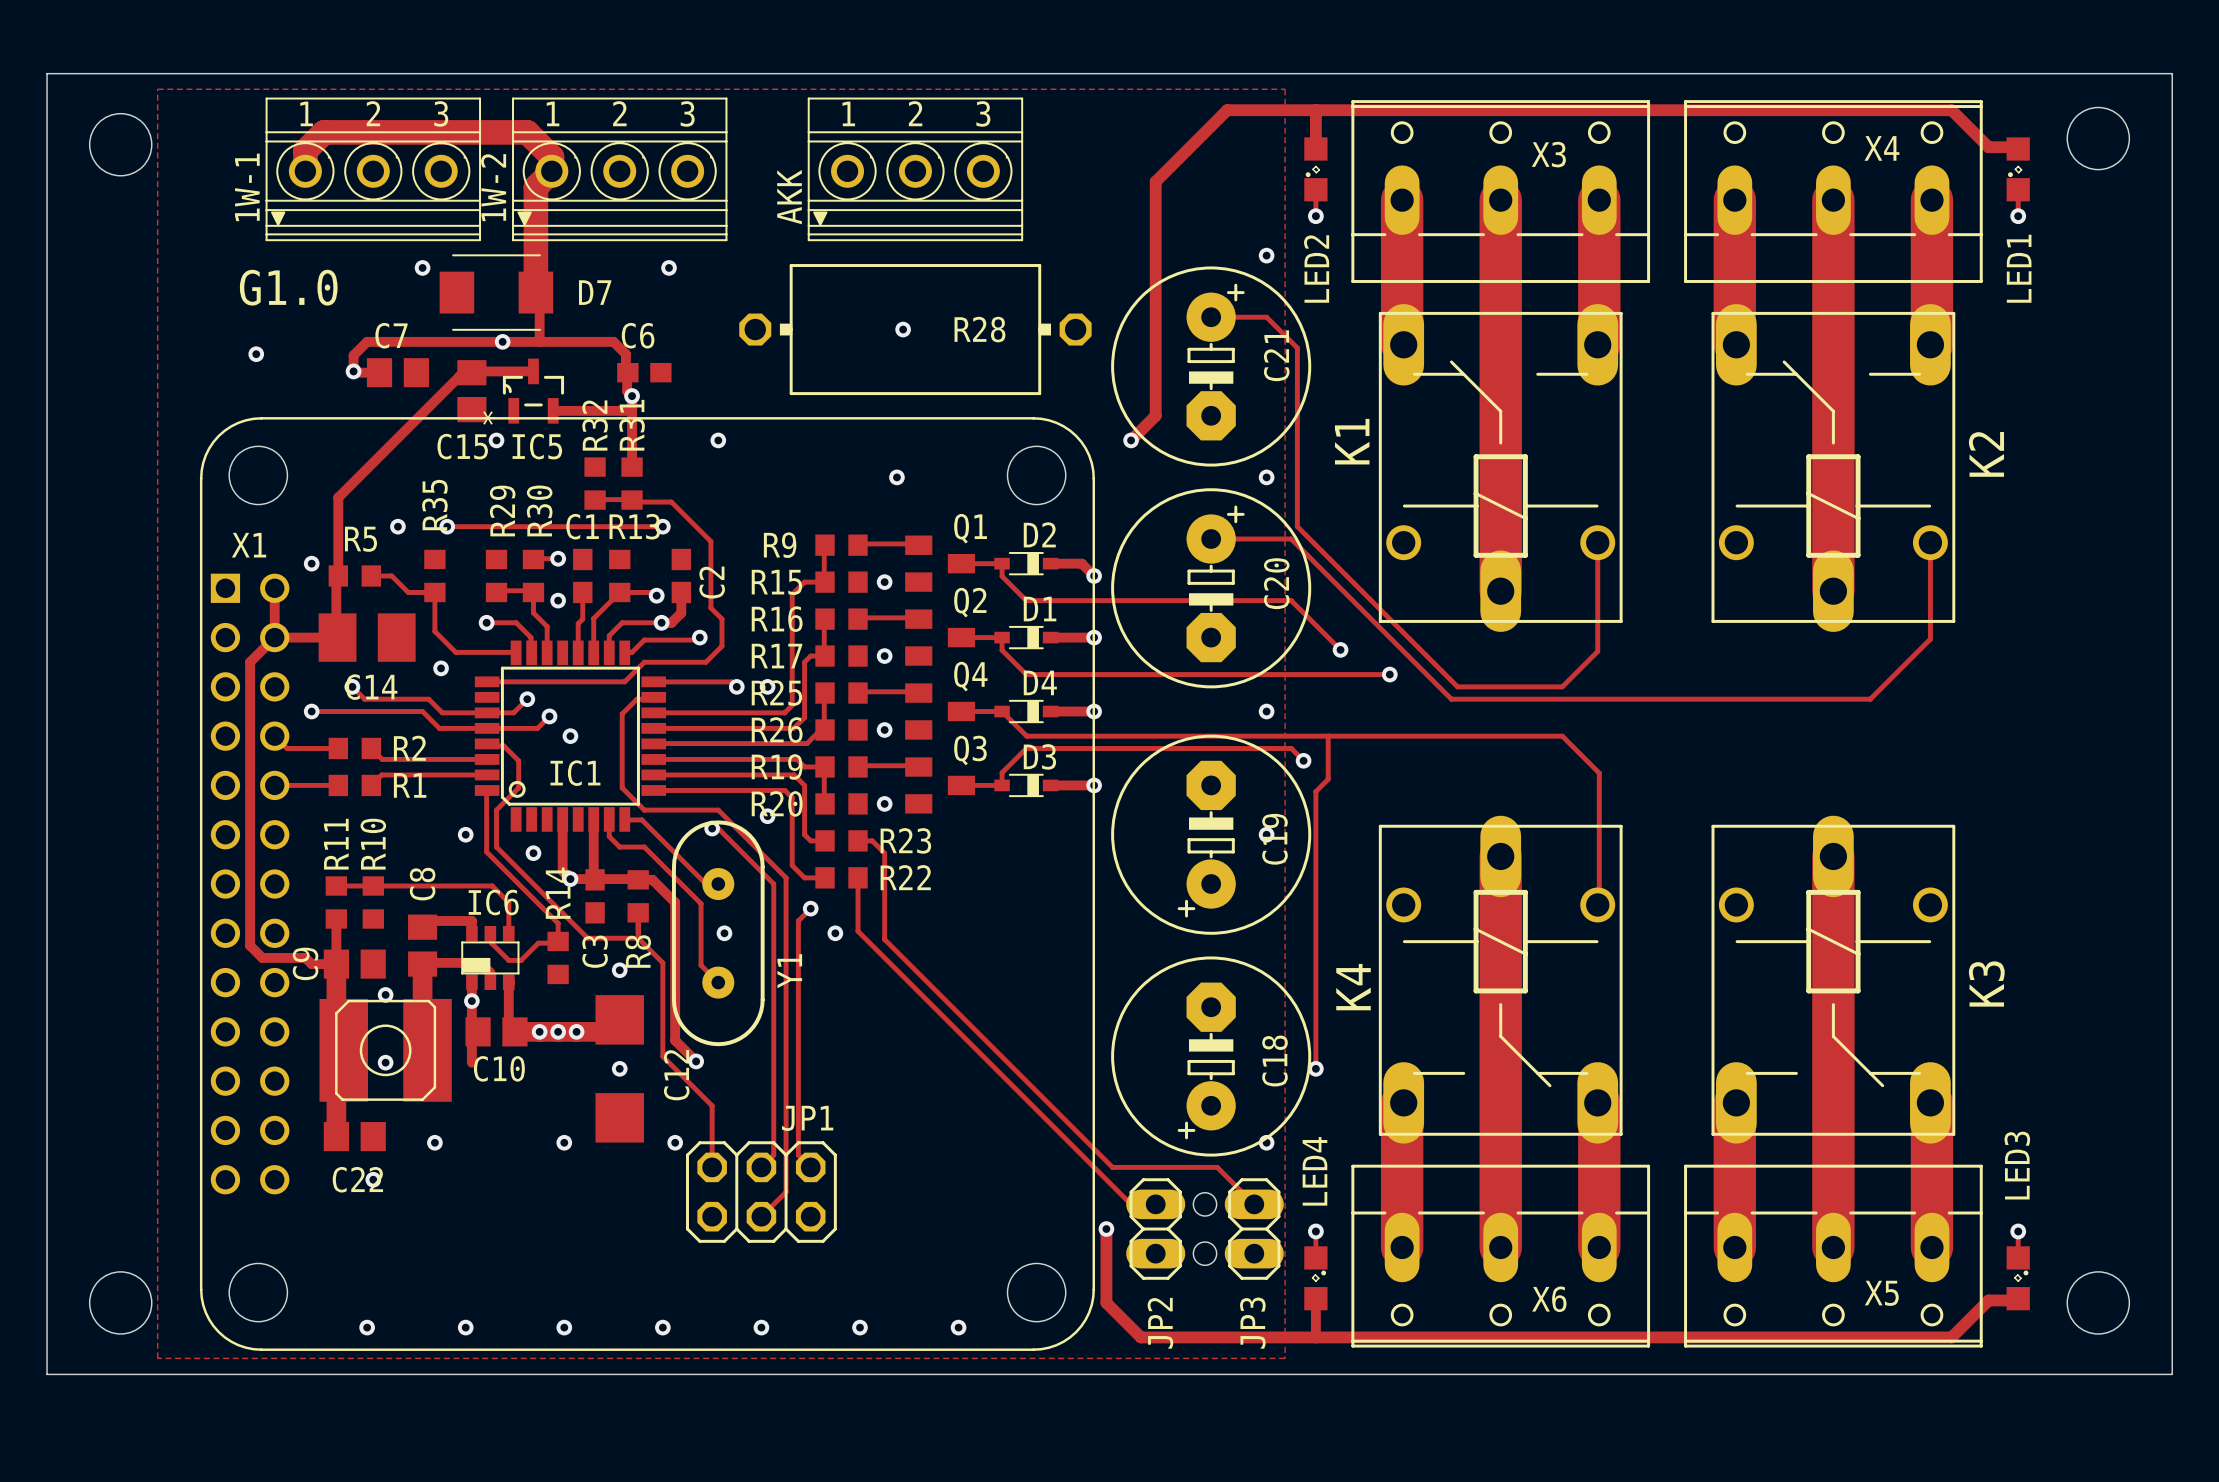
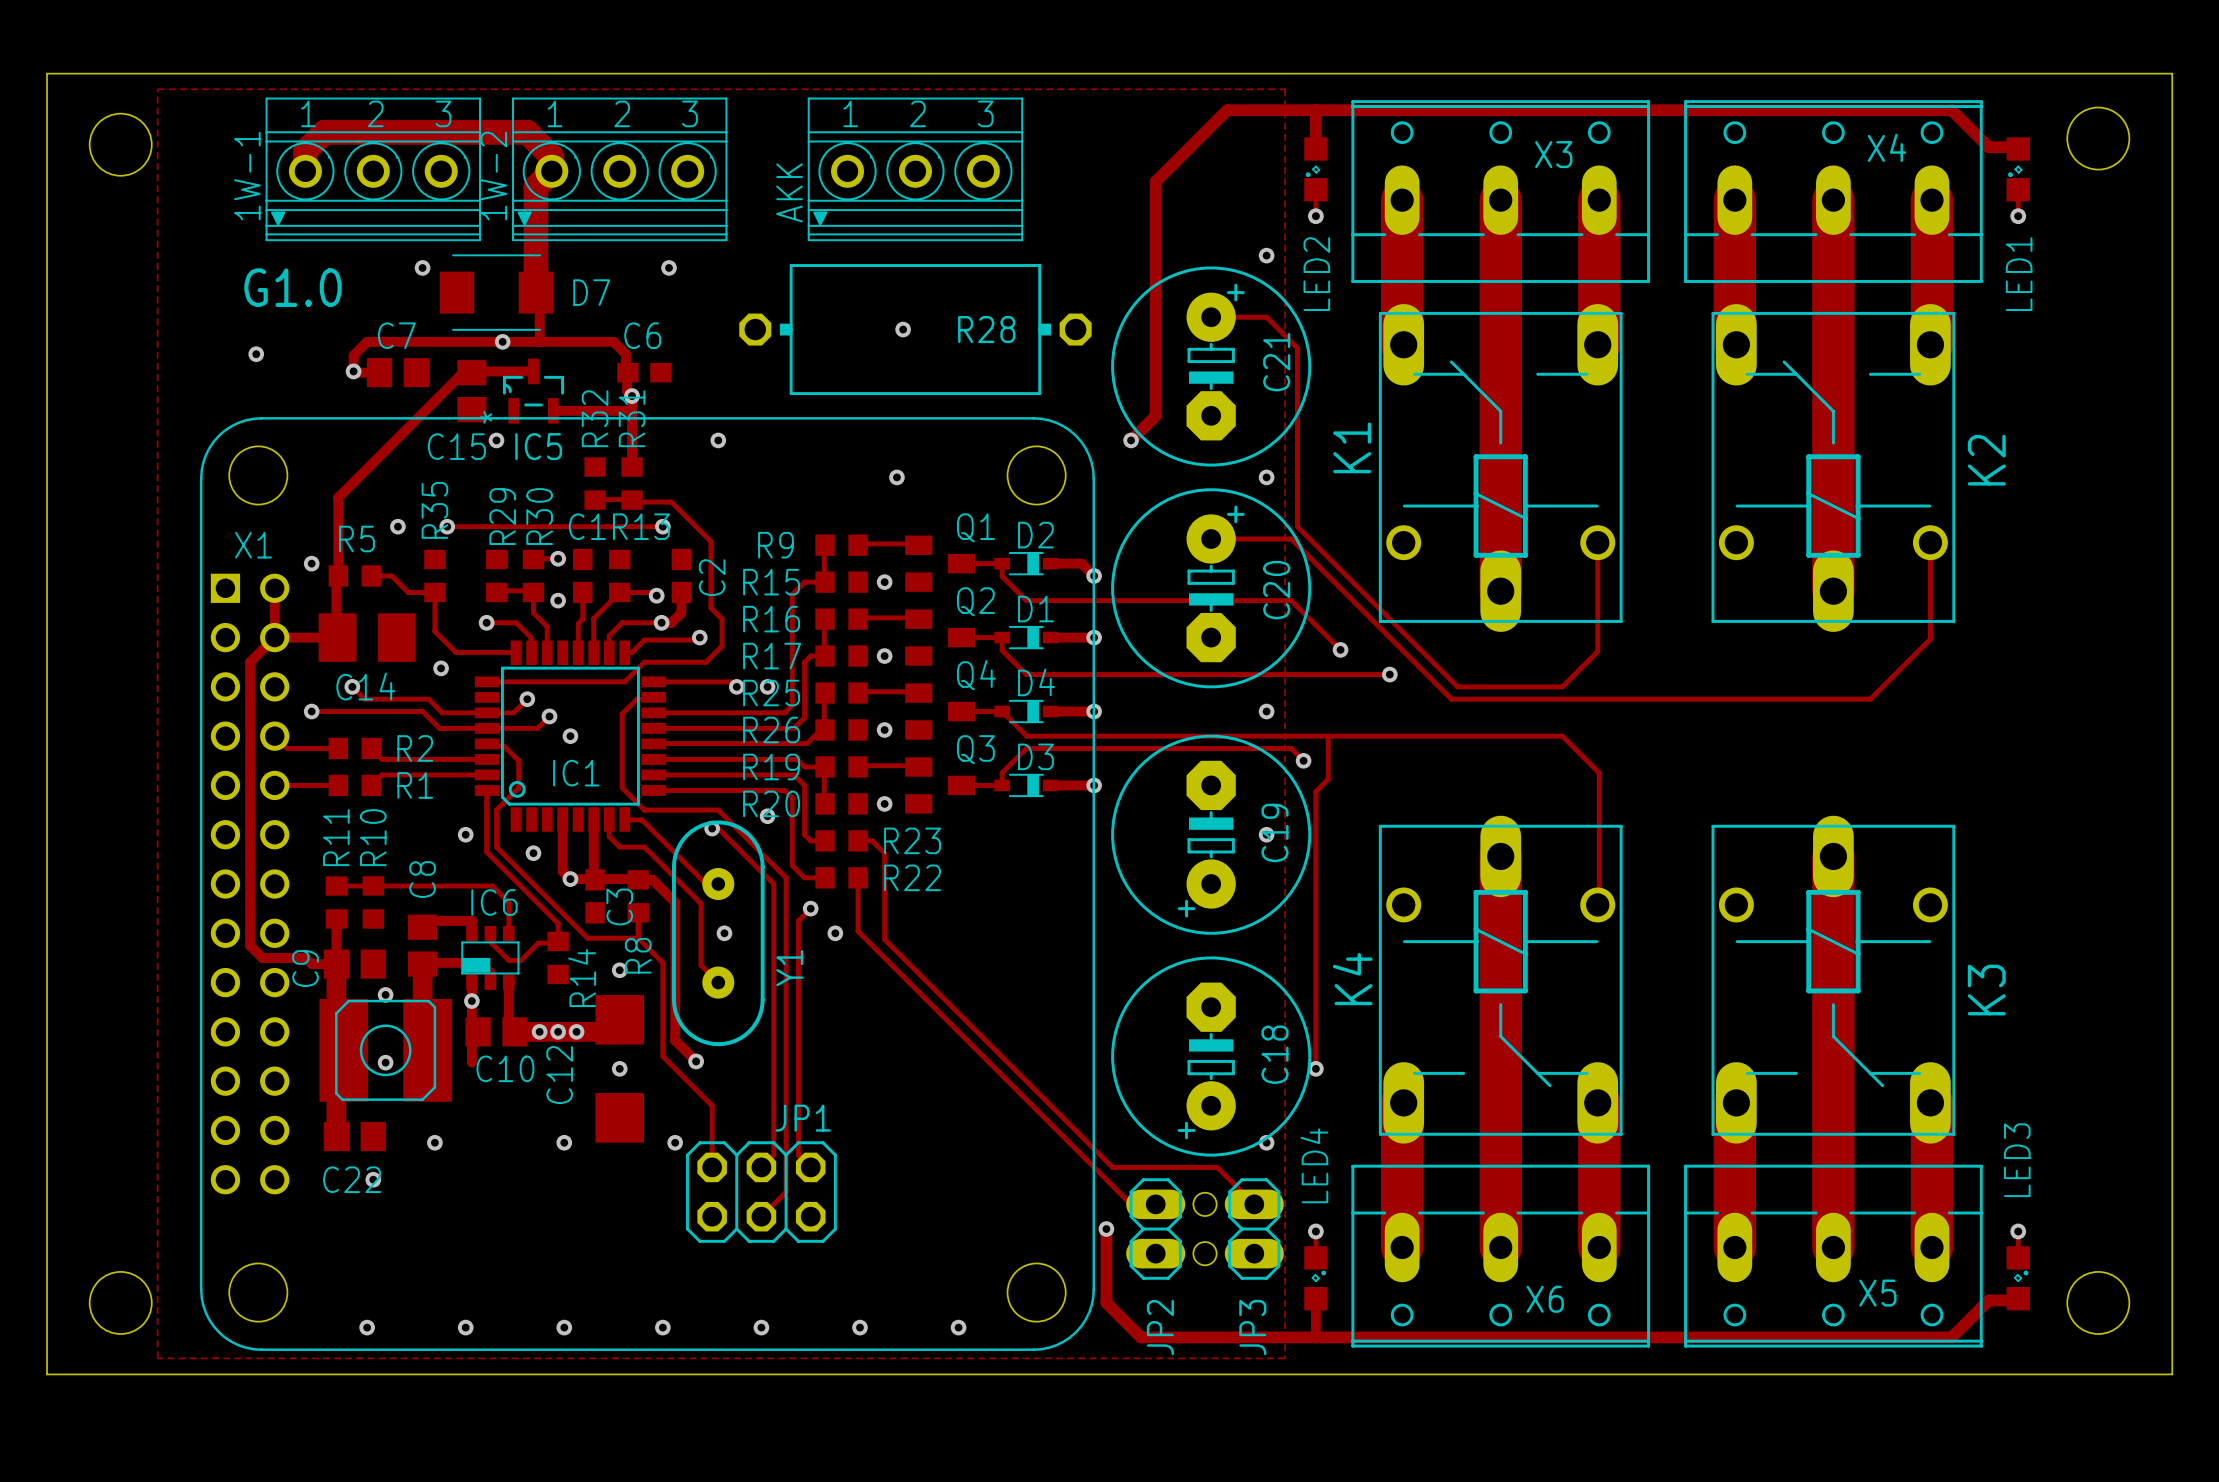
R14 name position: R14 (558, 893) -> R14 (582, 978)
C3 name position: C3 (595, 951) -> C3 (619, 906)
C12 name position: C12 (676, 1075) -> C12 (559, 1075)

